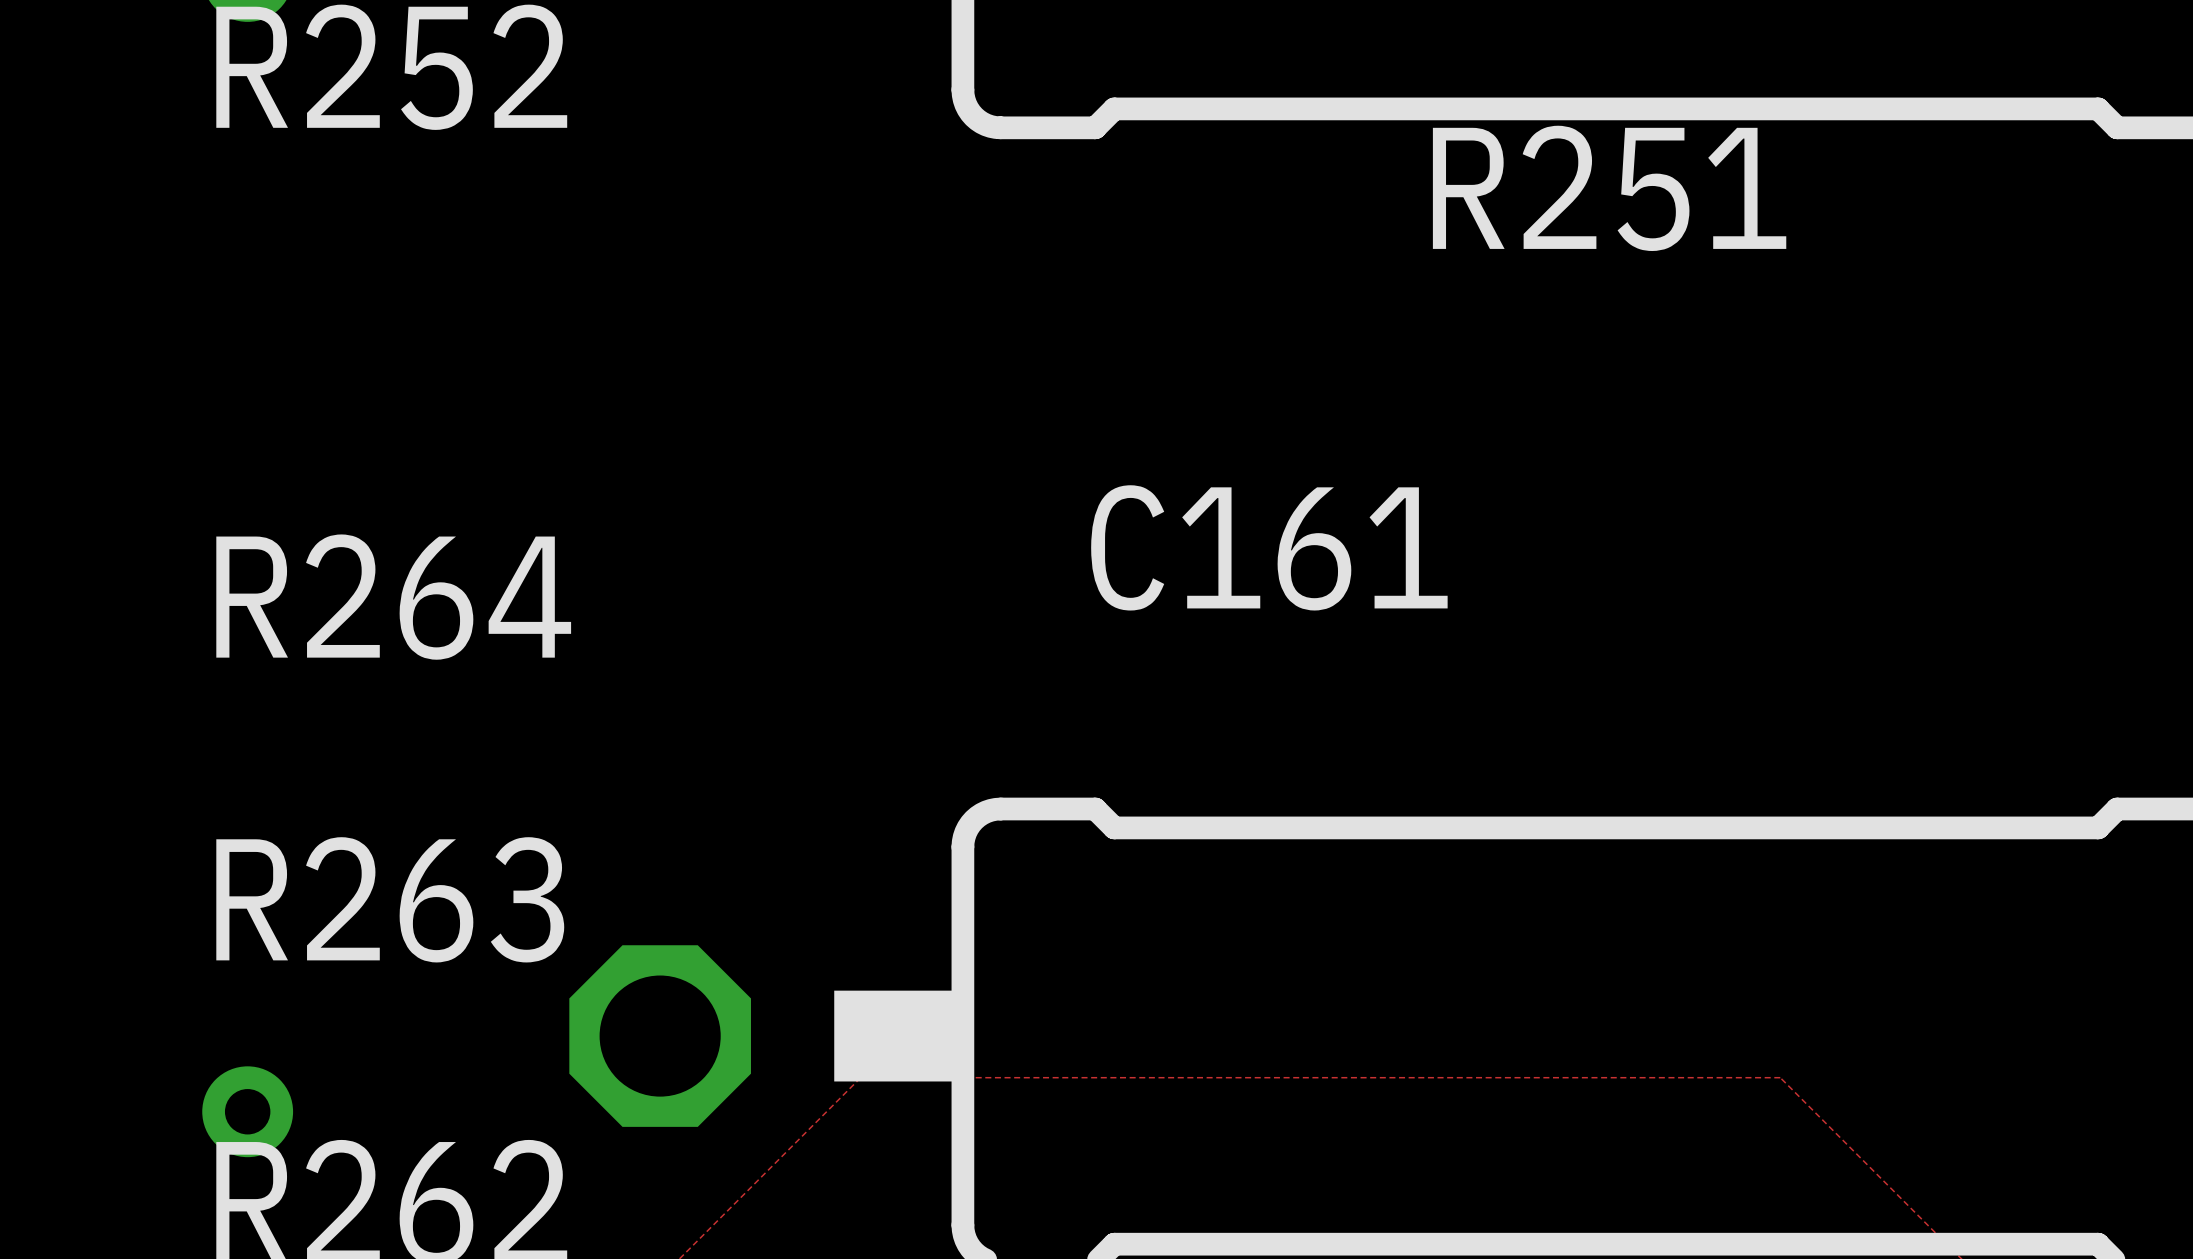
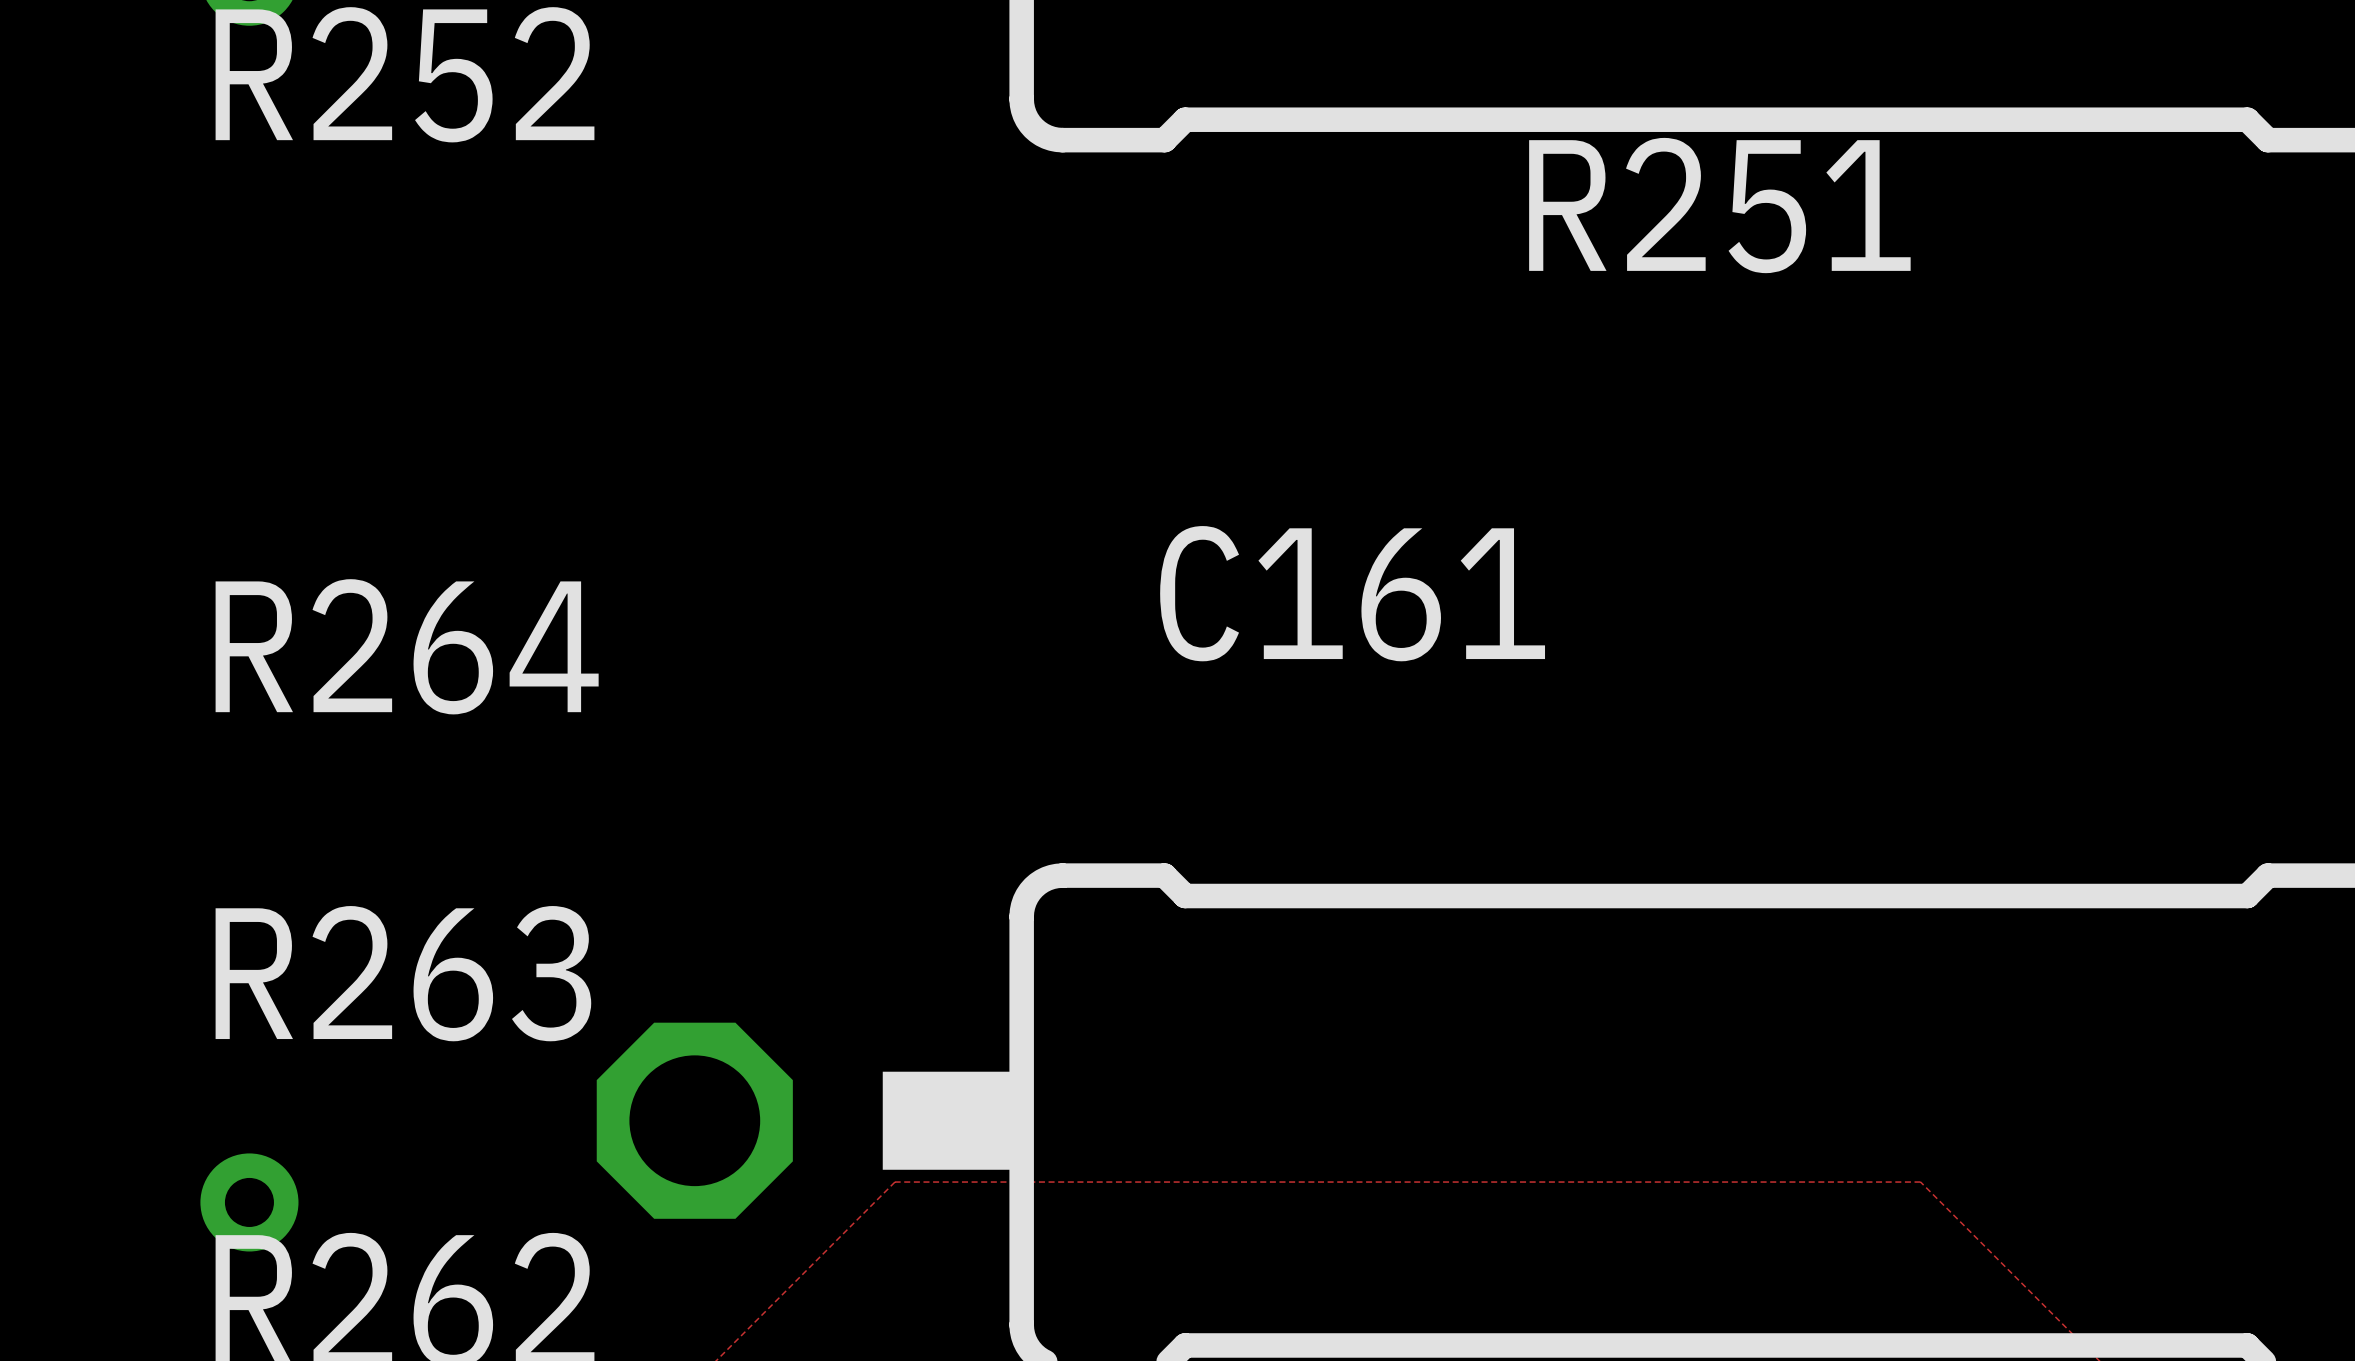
zone outline: (845, 1092) (860, 1077) (1780, 1077) (1795, 1092) -> (895, 1182) (1920, 1182)

